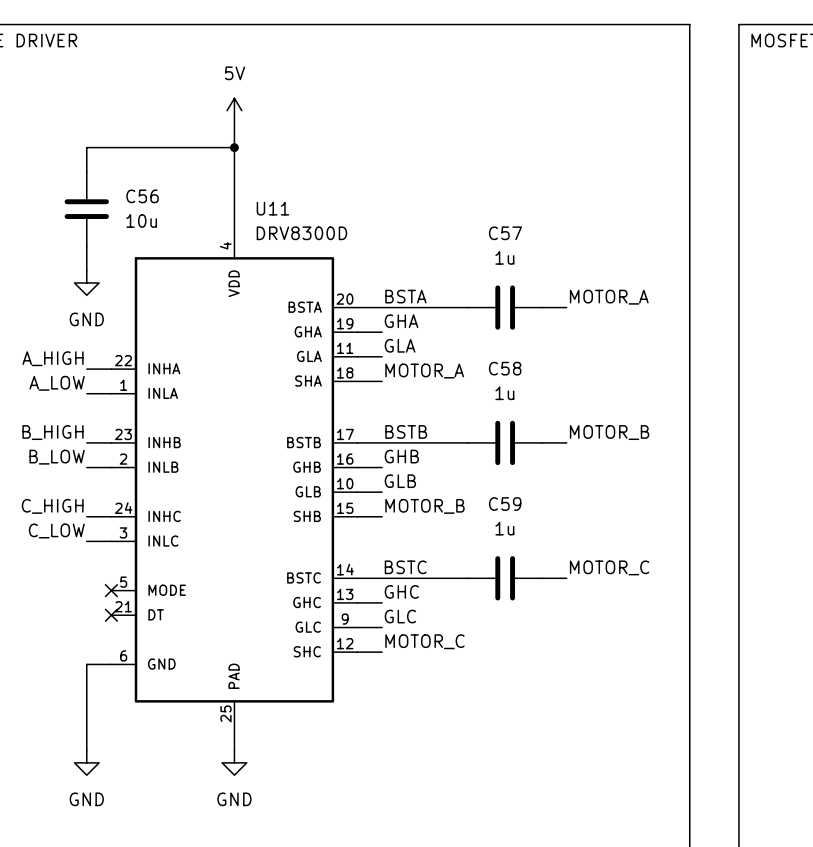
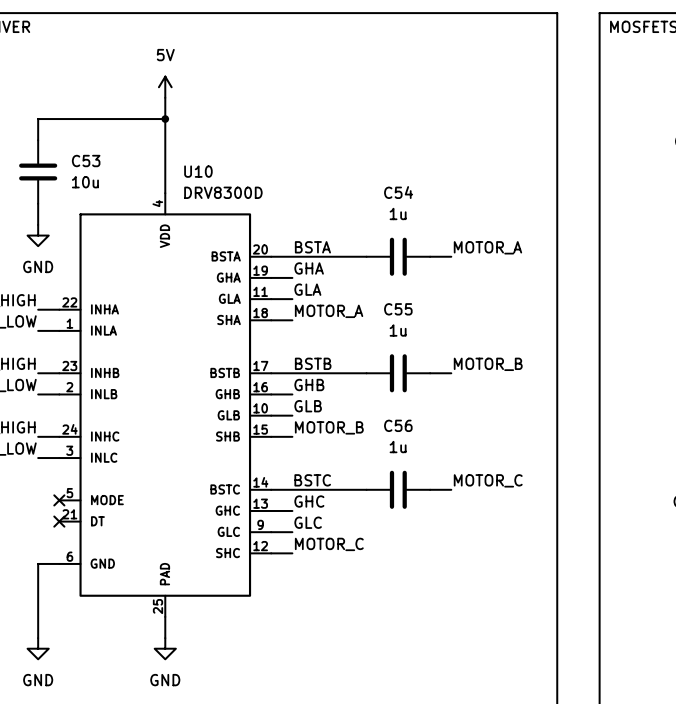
C56 name: C56 (142, 196) -> C53 (86, 161)
U11 name: U11 (272, 208) -> U10 (198, 171)
C57 name: C57 (505, 233) -> C54 (398, 192)
C58 name: C58 (505, 368) -> C55 (398, 309)
C59 name: C59 (505, 504) -> C56 (398, 425)

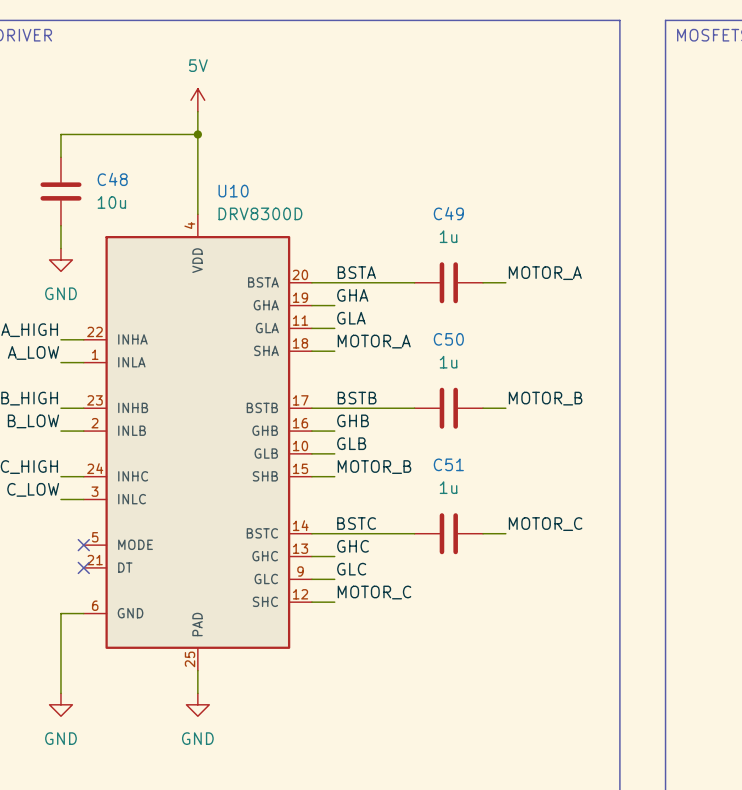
C53 name: C53 (86, 161) -> C48 (112, 179)
C54 name: C54 (398, 192) -> C49 (448, 213)
C55 name: C55 (398, 309) -> C50 (448, 339)
C56 name: C56 (398, 425) -> C51 (448, 464)

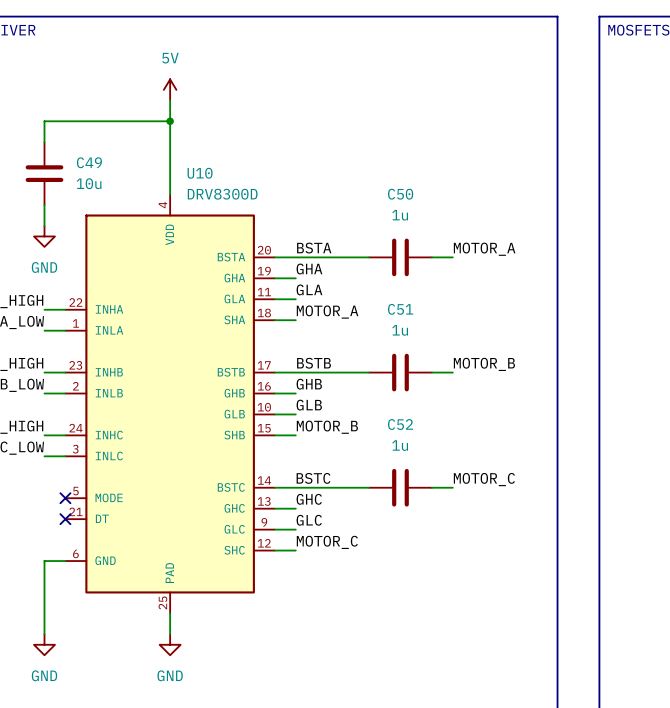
C48 name: C48 (112, 179) -> C49 (89, 162)
C49 name: C49 (448, 213) -> C50 (400, 194)
C50 name: C50 (448, 339) -> C51 (400, 309)
C51 name: C51 (448, 464) -> C52 (400, 424)

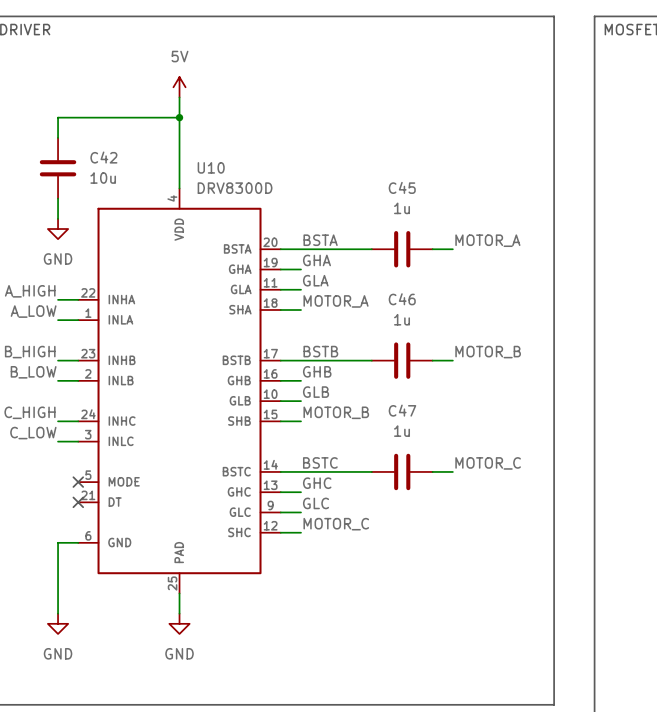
C49 name: C49 (89, 162) -> C42 (103, 157)
C50 name: C50 (400, 194) -> C45 (402, 187)
C51 name: C51 (400, 309) -> C46 (402, 299)
C52 name: C52 (400, 424) -> C47 (402, 410)

